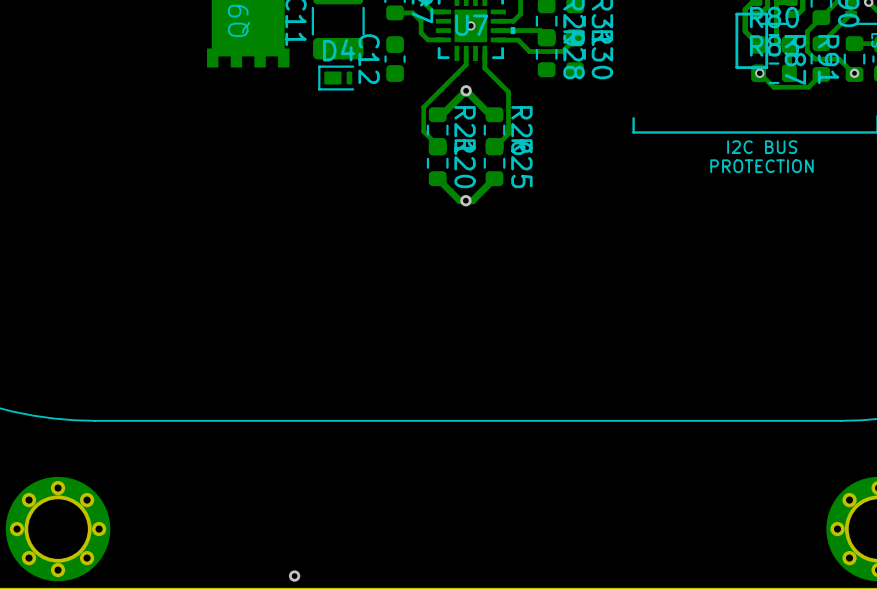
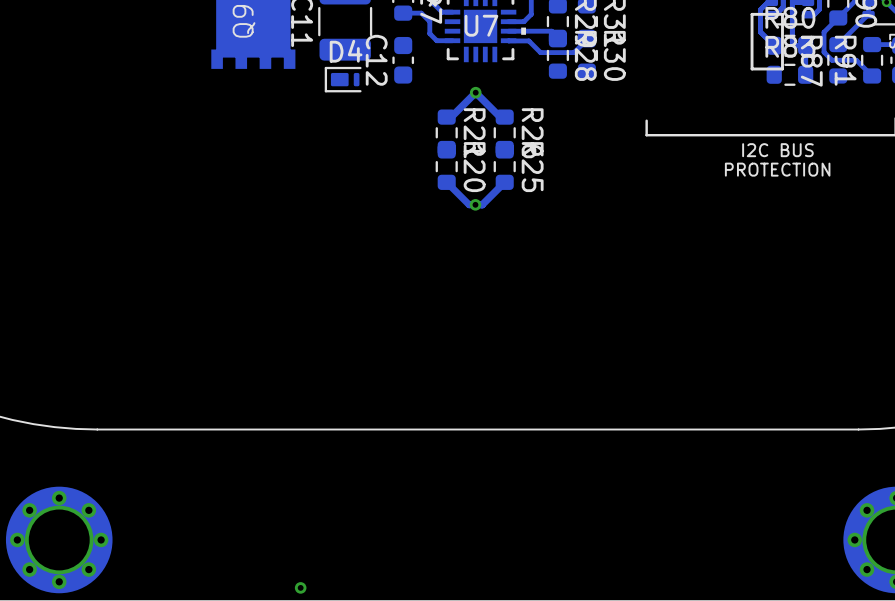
via: (470, 25) -> none
track: (466, 53) (466, 64) (423, 107) (423, 131) (437, 145) -> none
track: (484, 53) (484, 68) (508, 91) (508, 133) (494, 147) -> none
track: (759, 73) (773, 87) (808, 87) (821, 74) -> none
via: (759, 73) -> none
via: (854, 73) -> none

